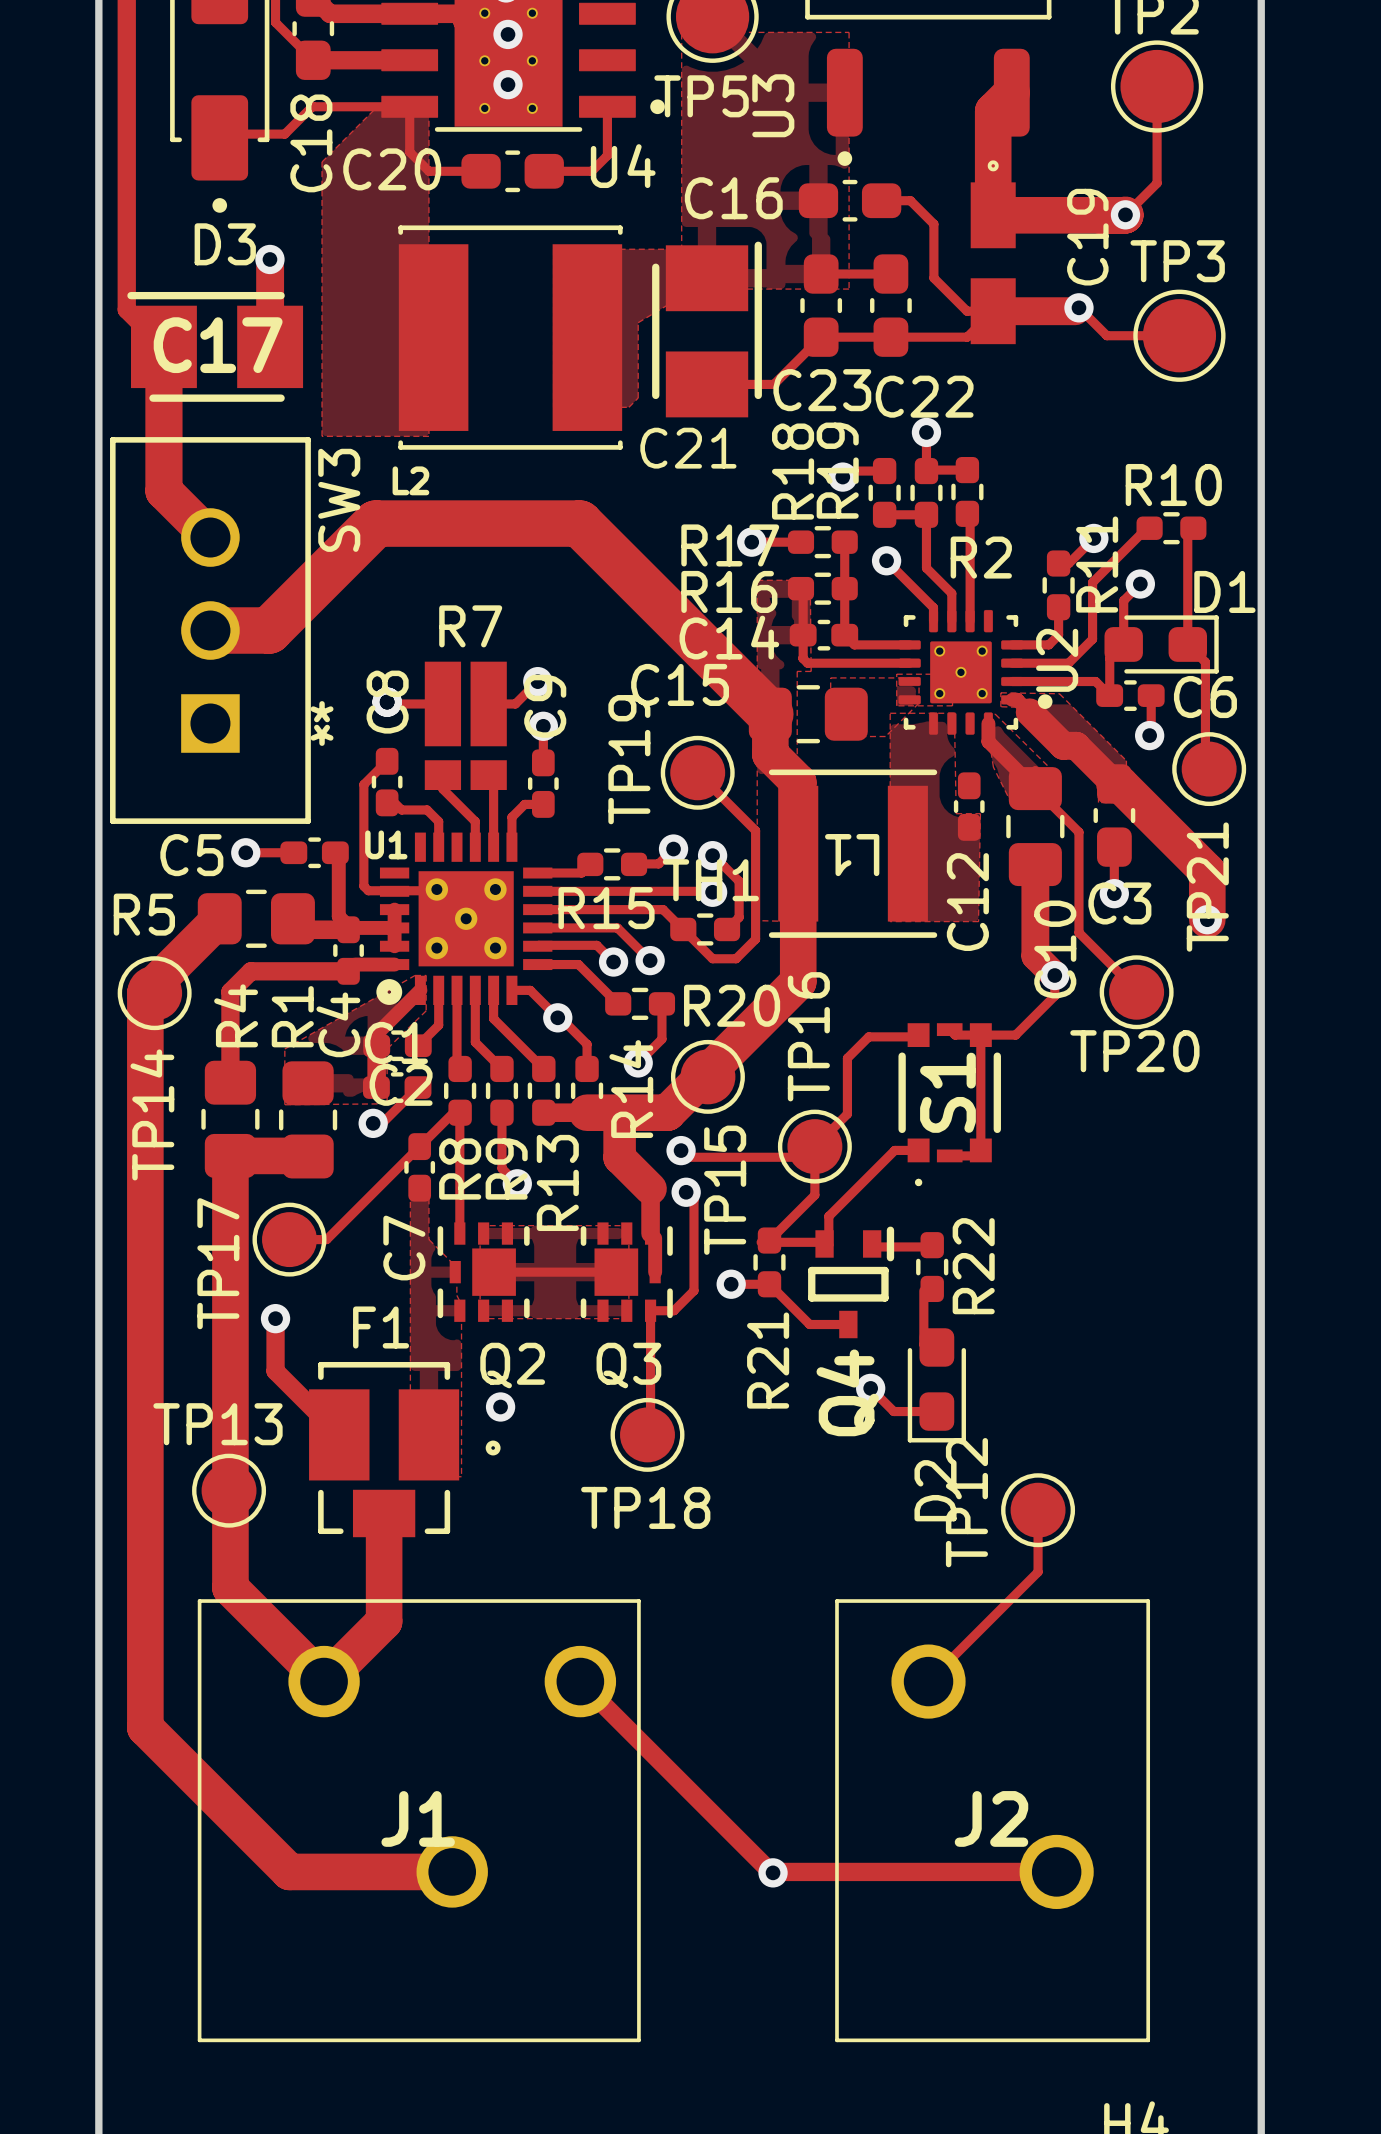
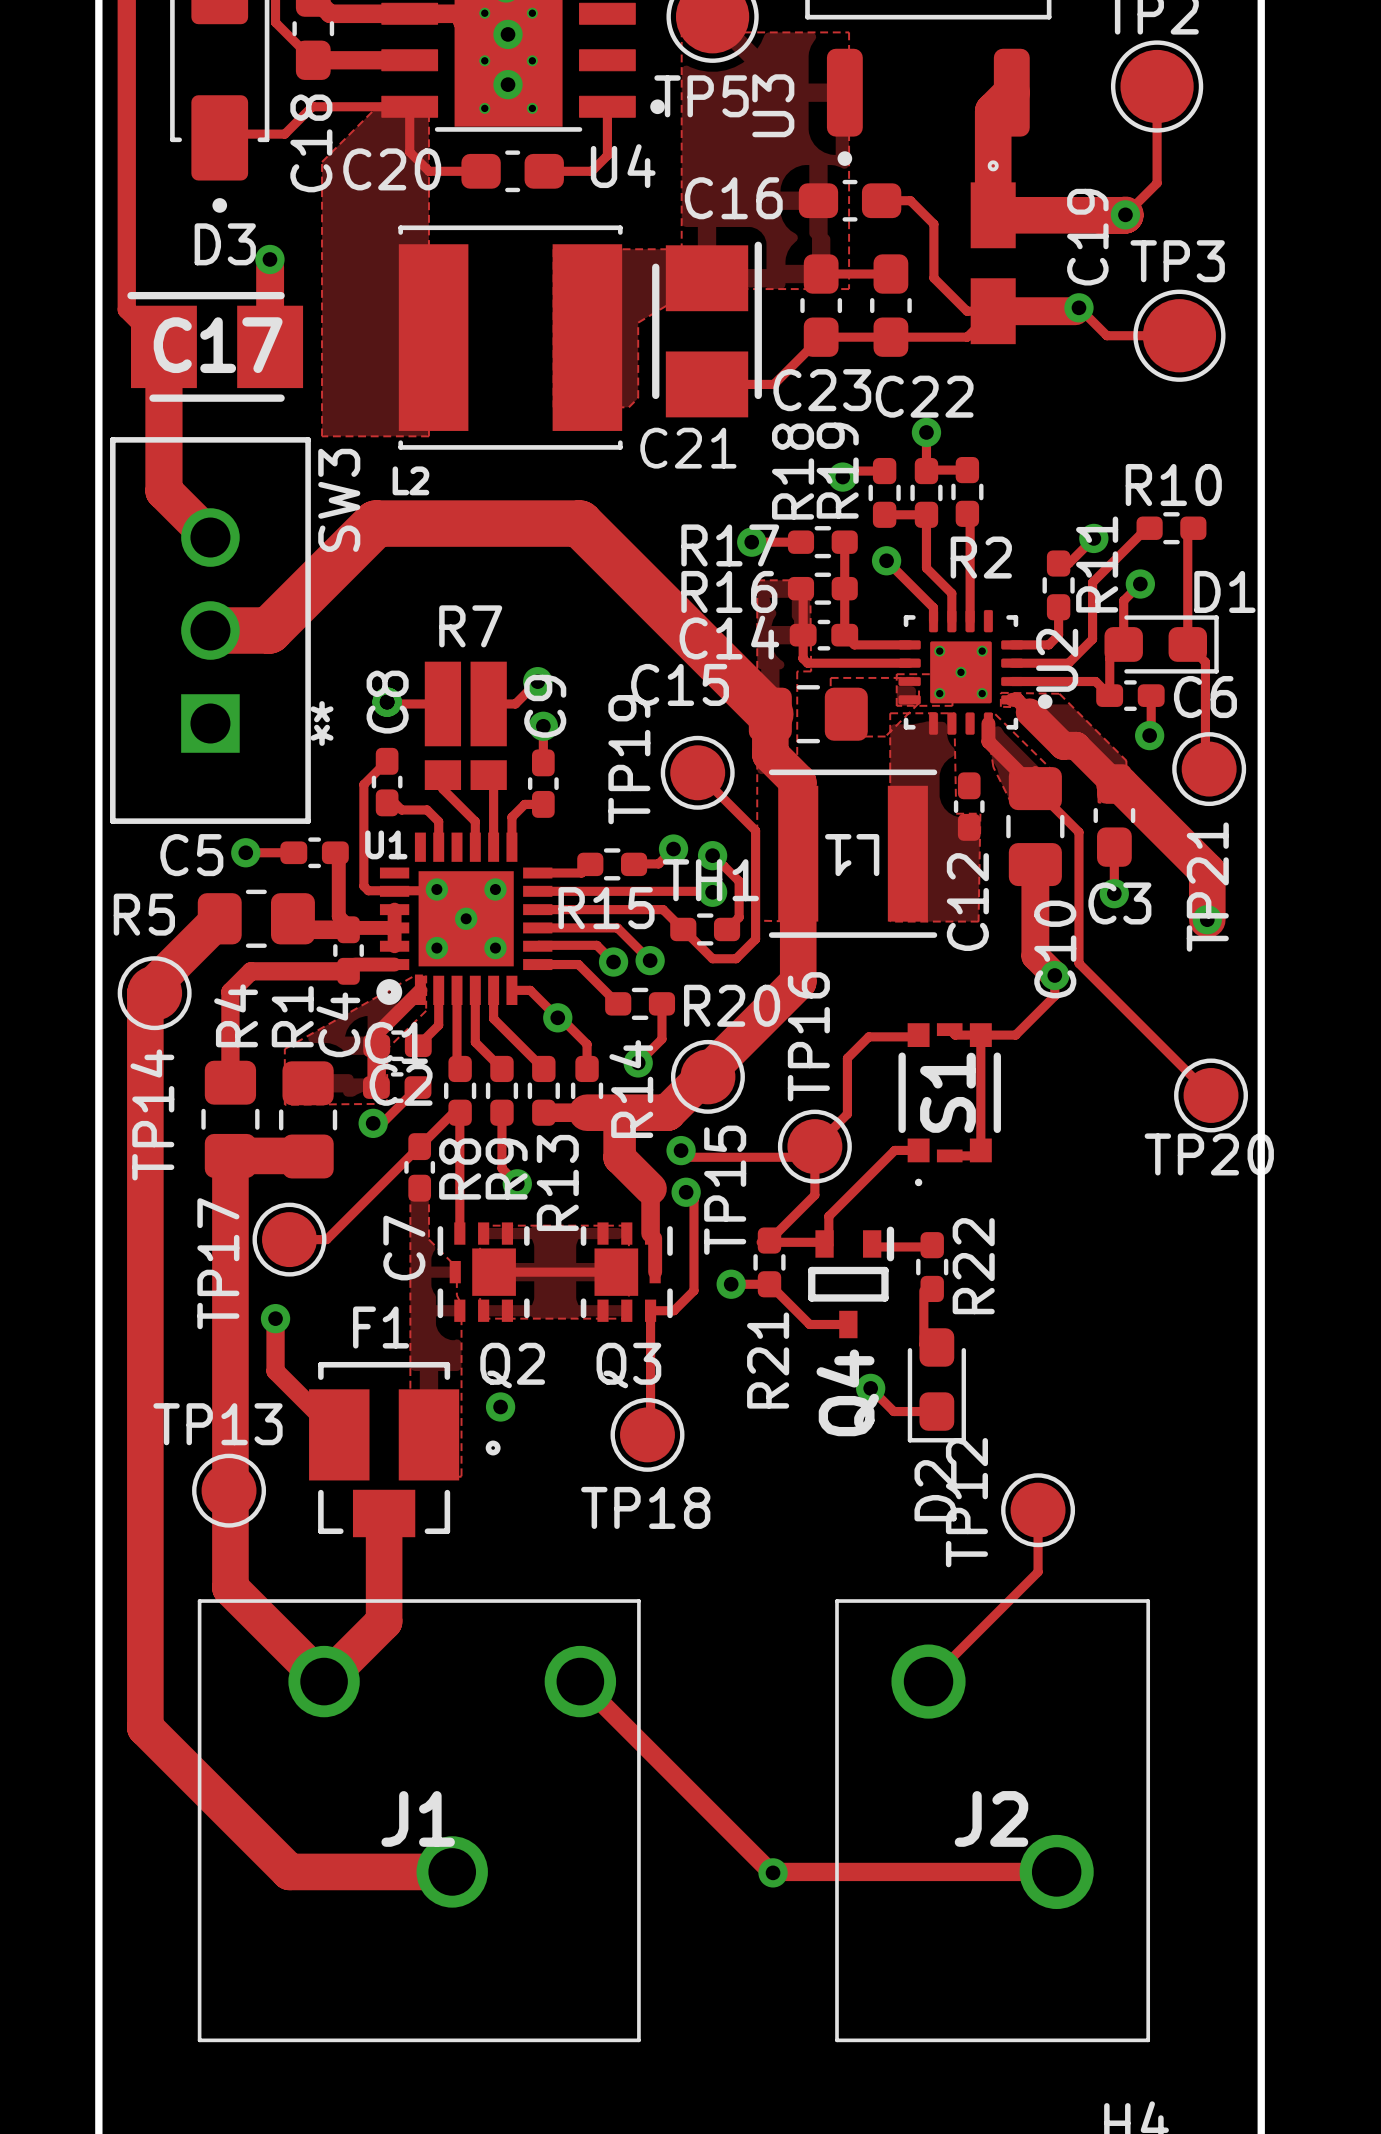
track: (1078, 932) (1149, 1003) -> (1078, 932) (1078, 963) (1211, 1095)
TP20 position: (1136, 992) -> (1211, 1095)

